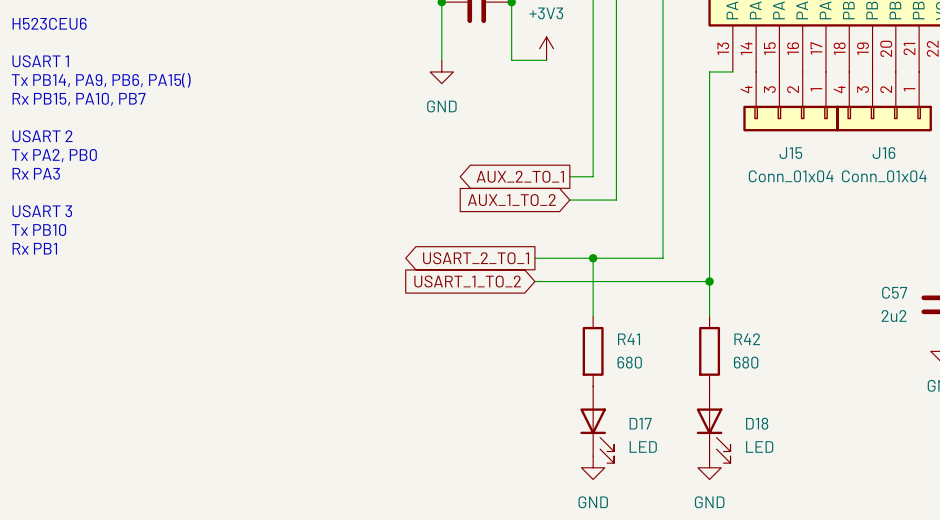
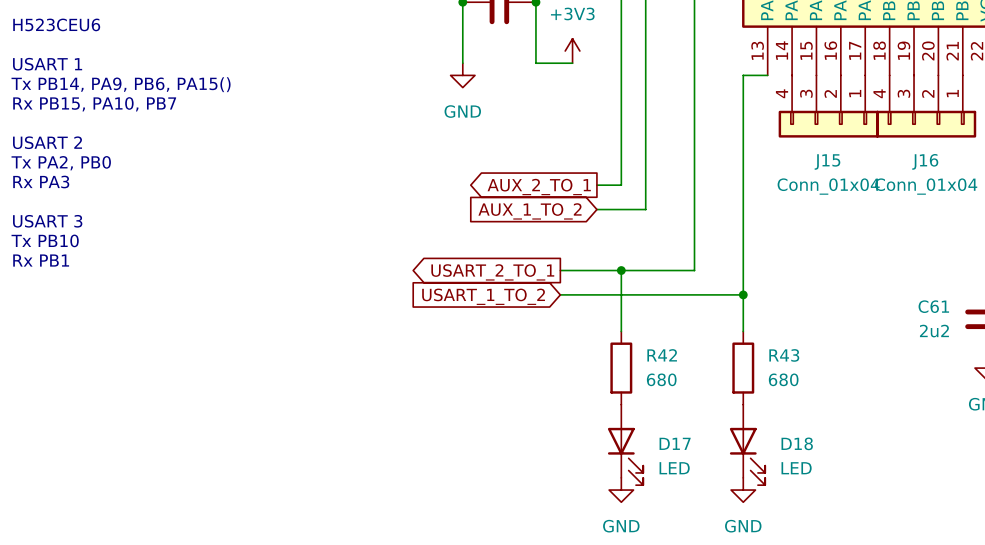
C57 name: C57 (894, 292) -> C61 (933, 306)
R41 name: R41 (629, 339) -> R42 (662, 355)
R42 name: R42 (747, 339) -> R43 (784, 355)

